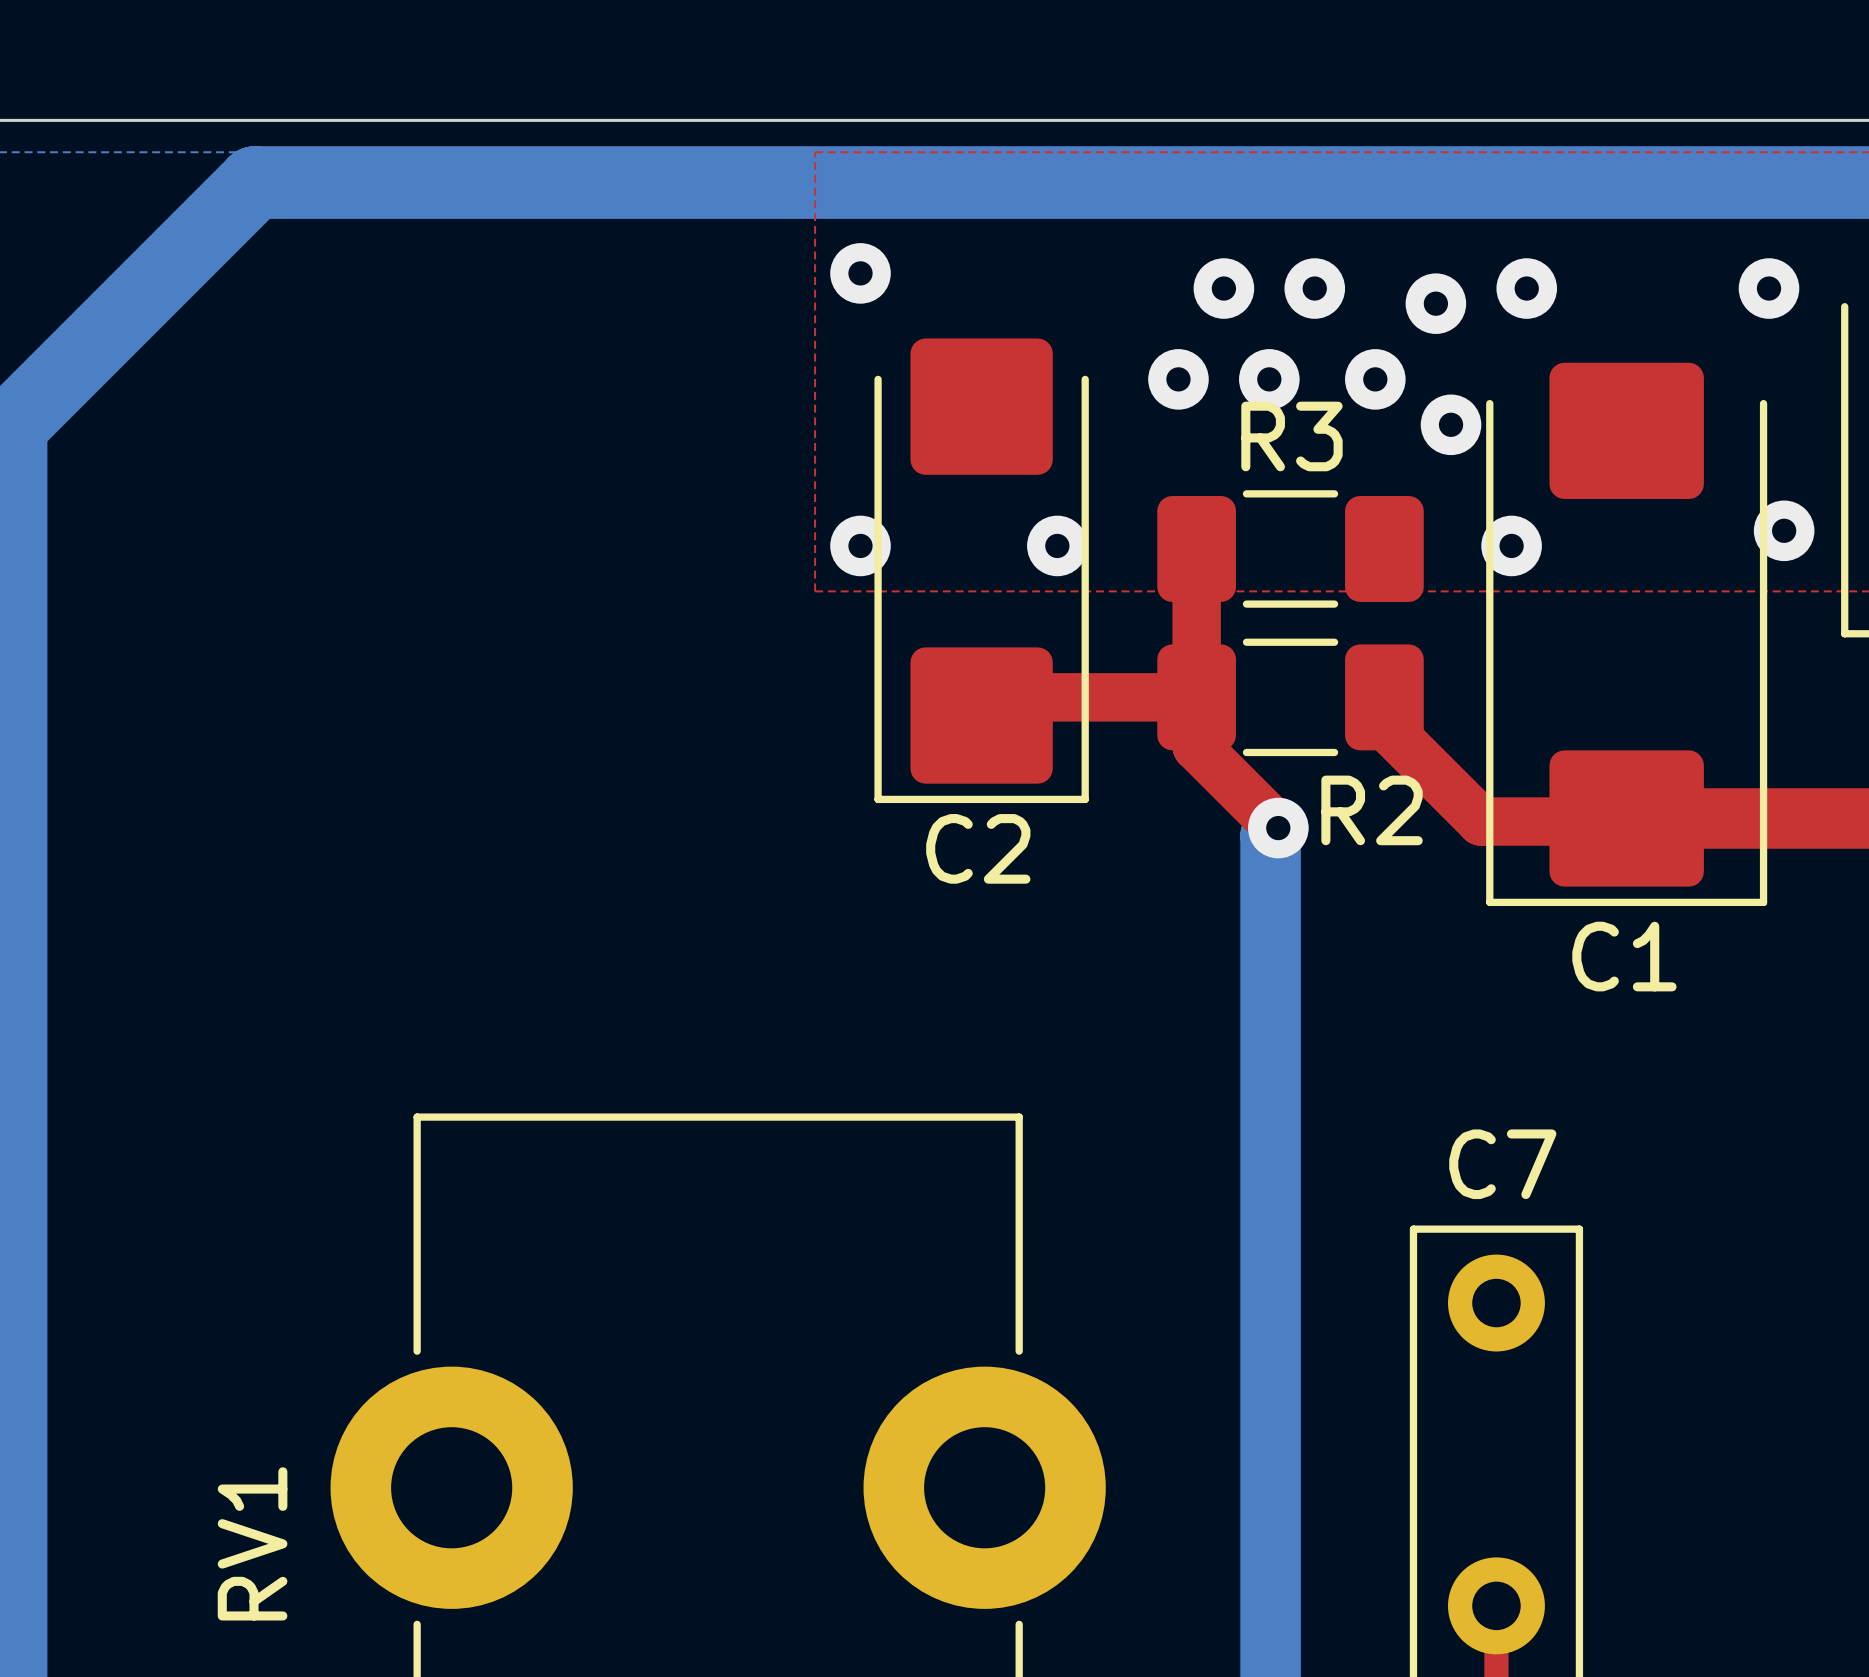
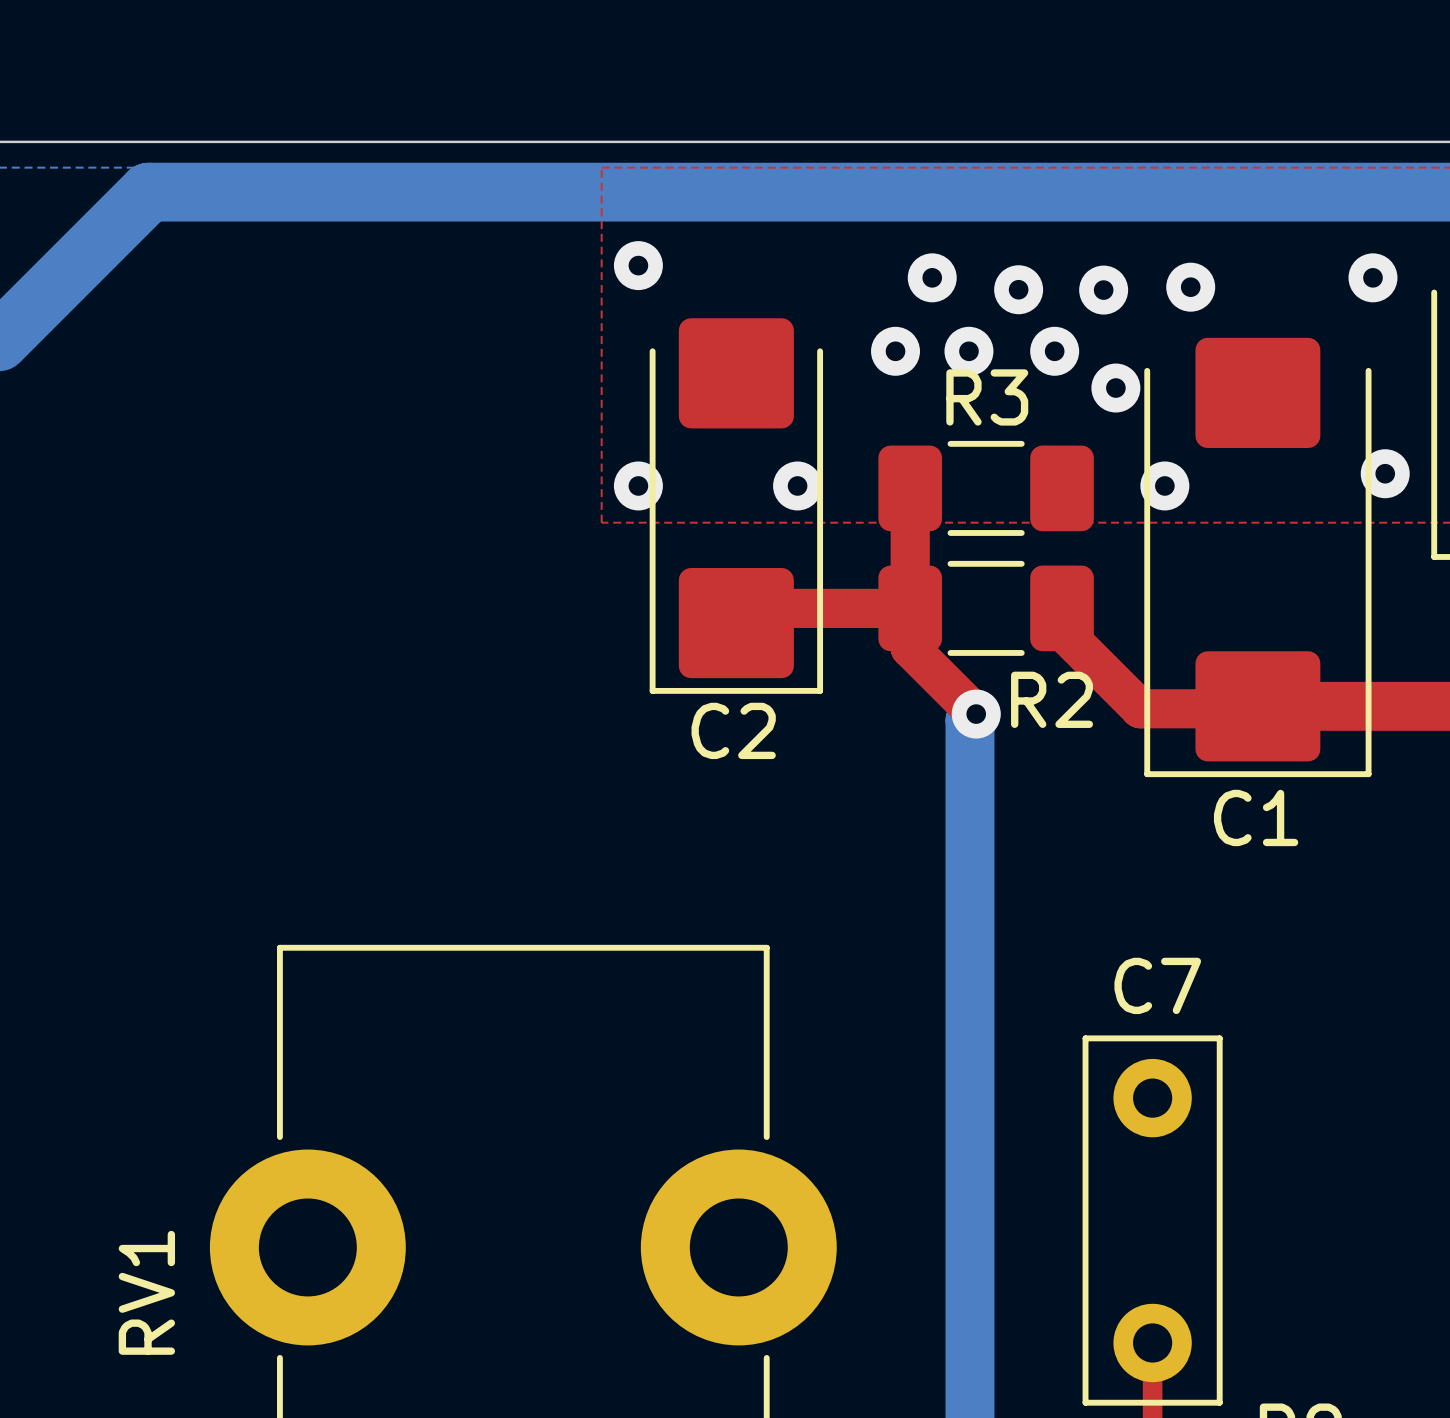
via position: (1314, 288) -> (1018, 289)
via position: (1526, 288) -> (1190, 287)

